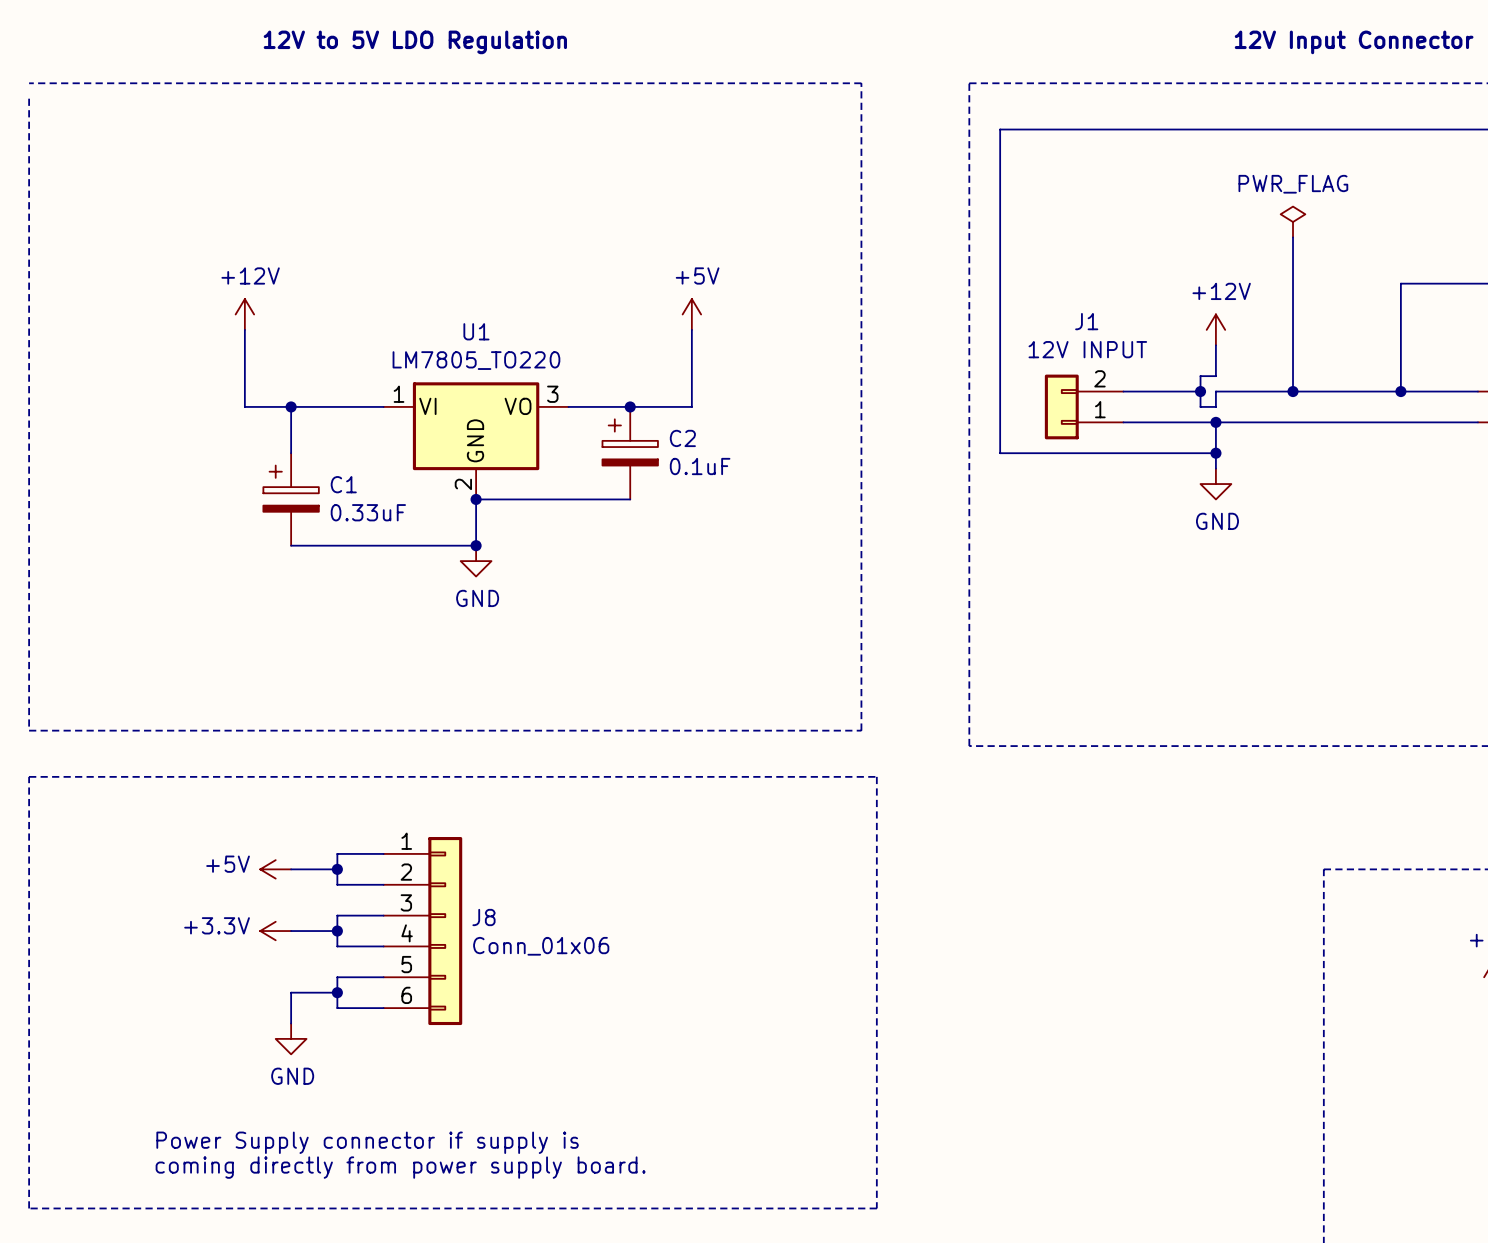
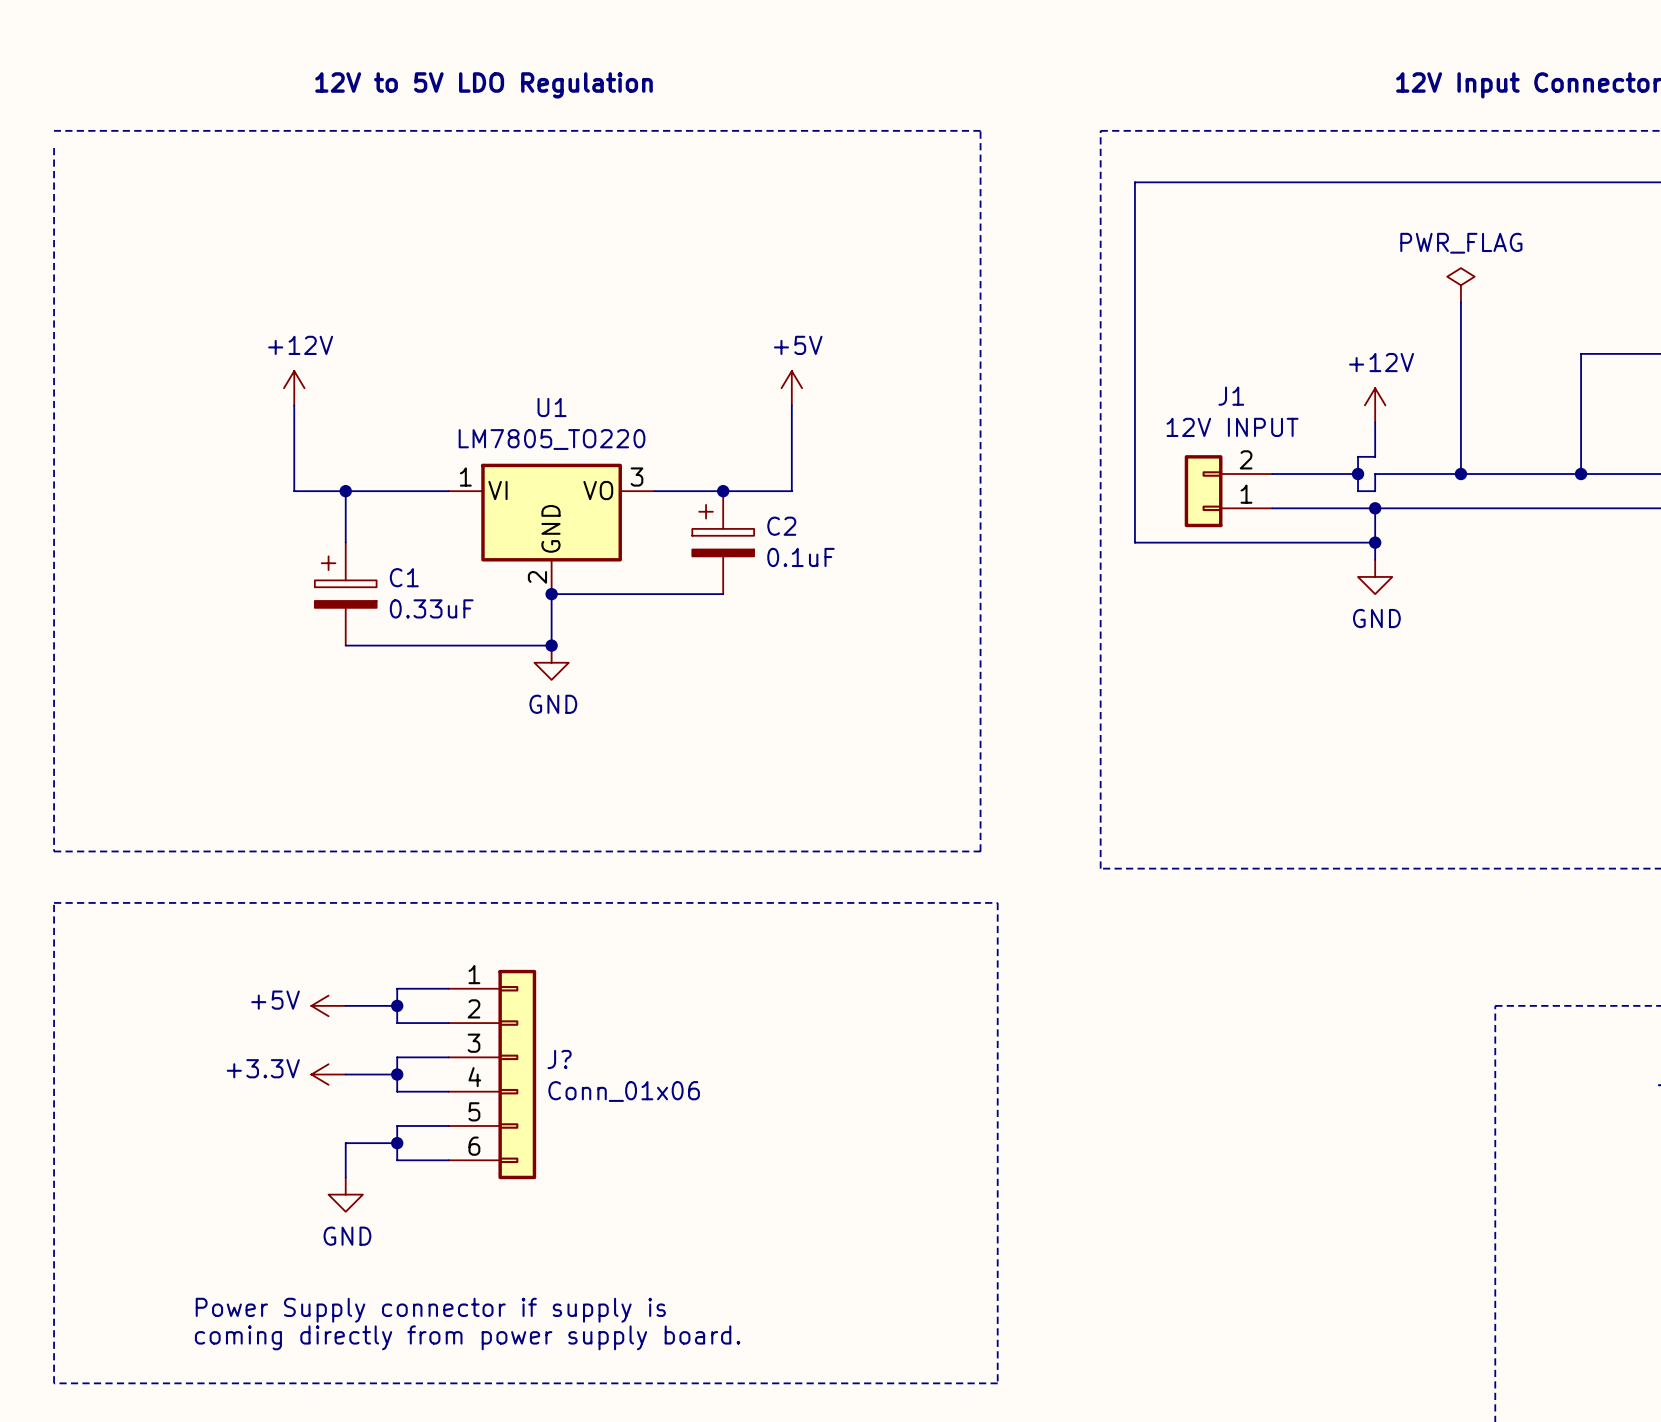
J8 name: J8 (483, 917) -> J? (559, 1059)

